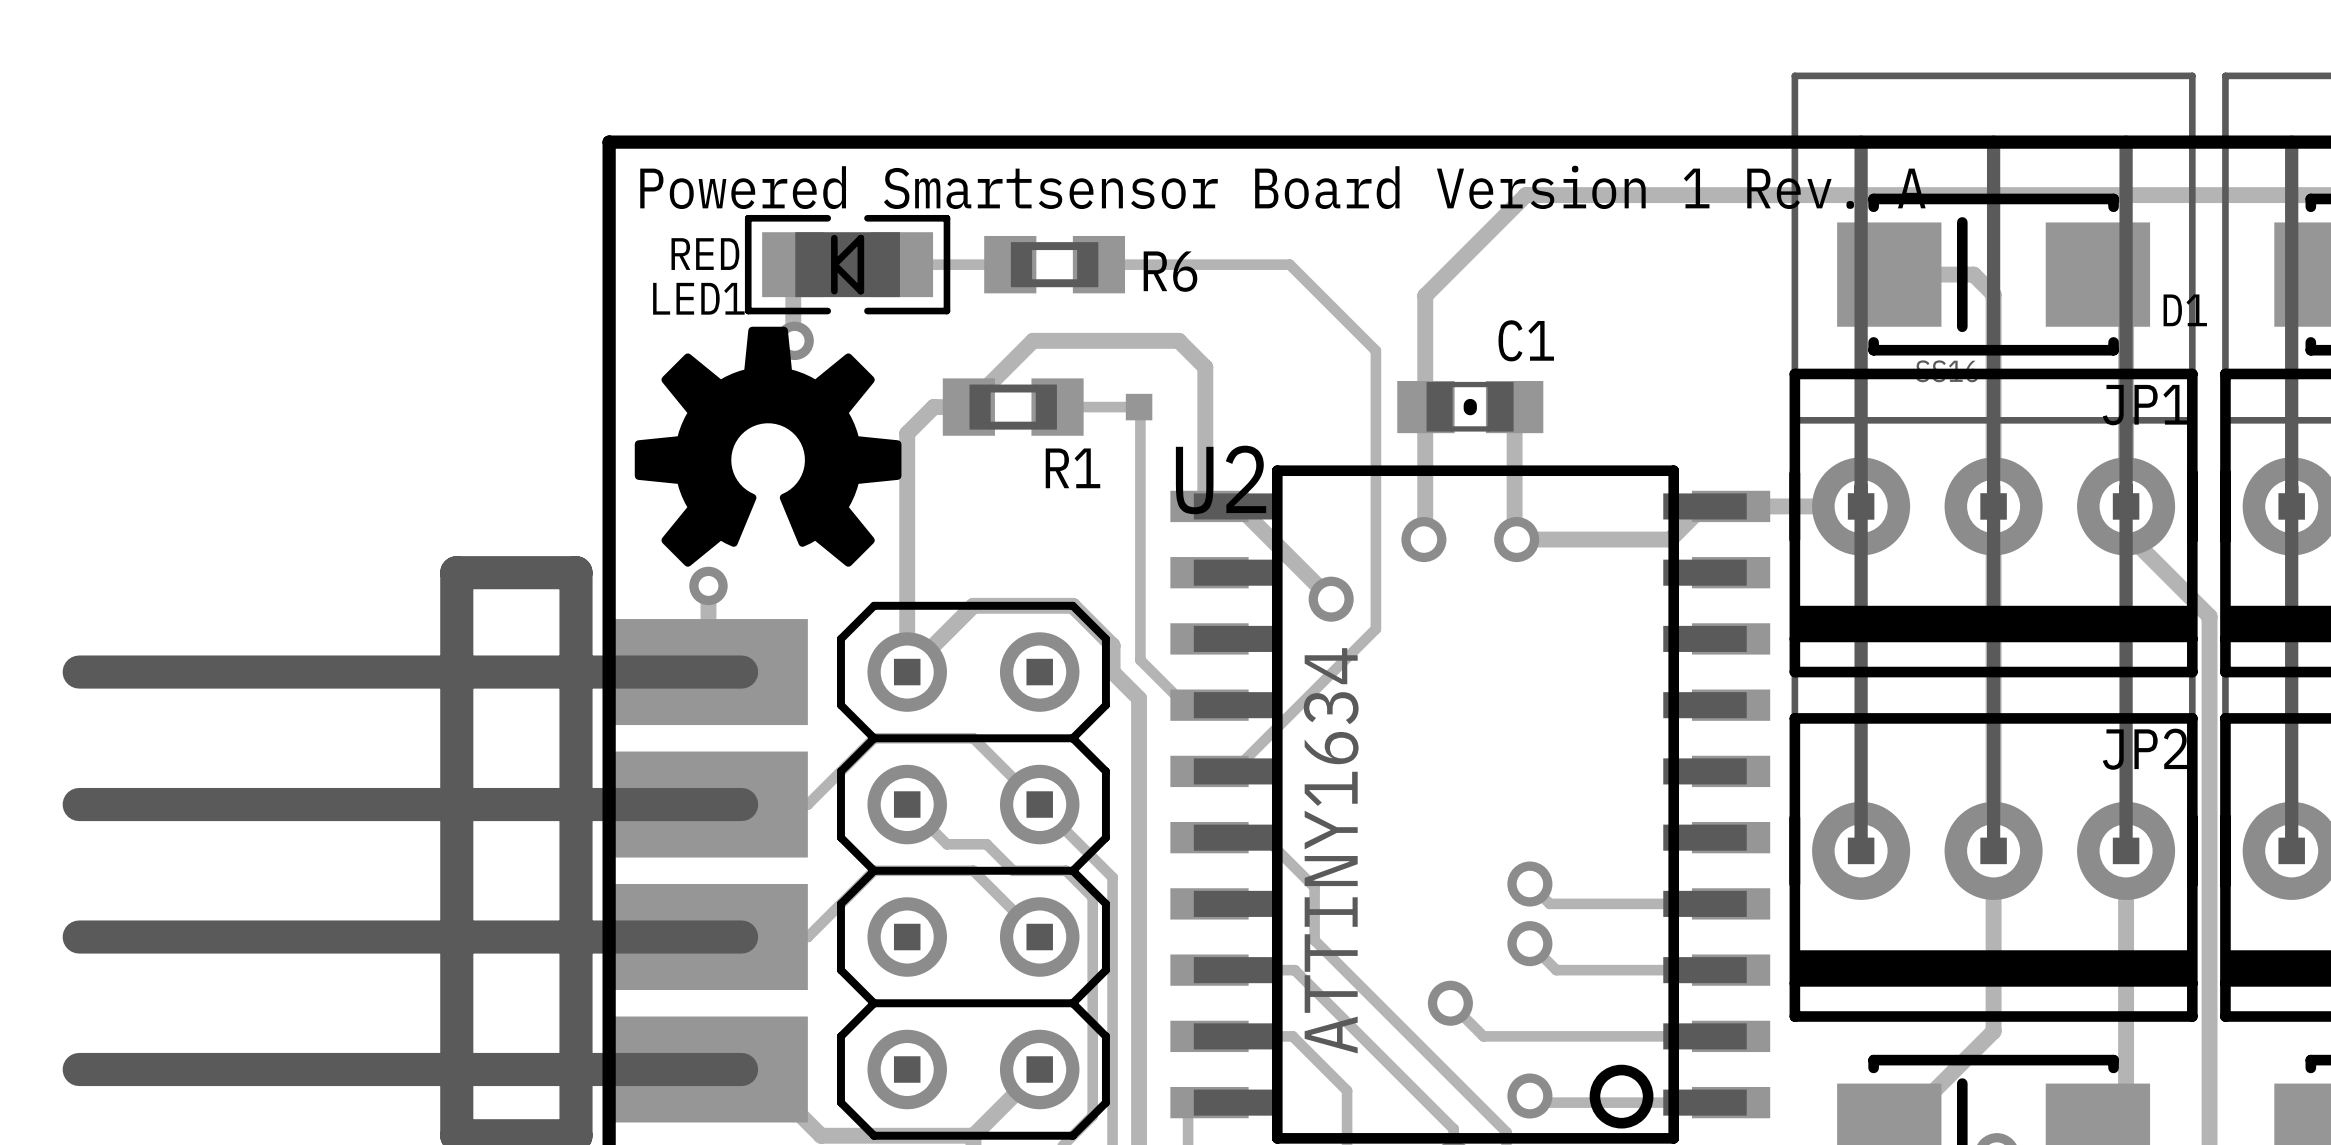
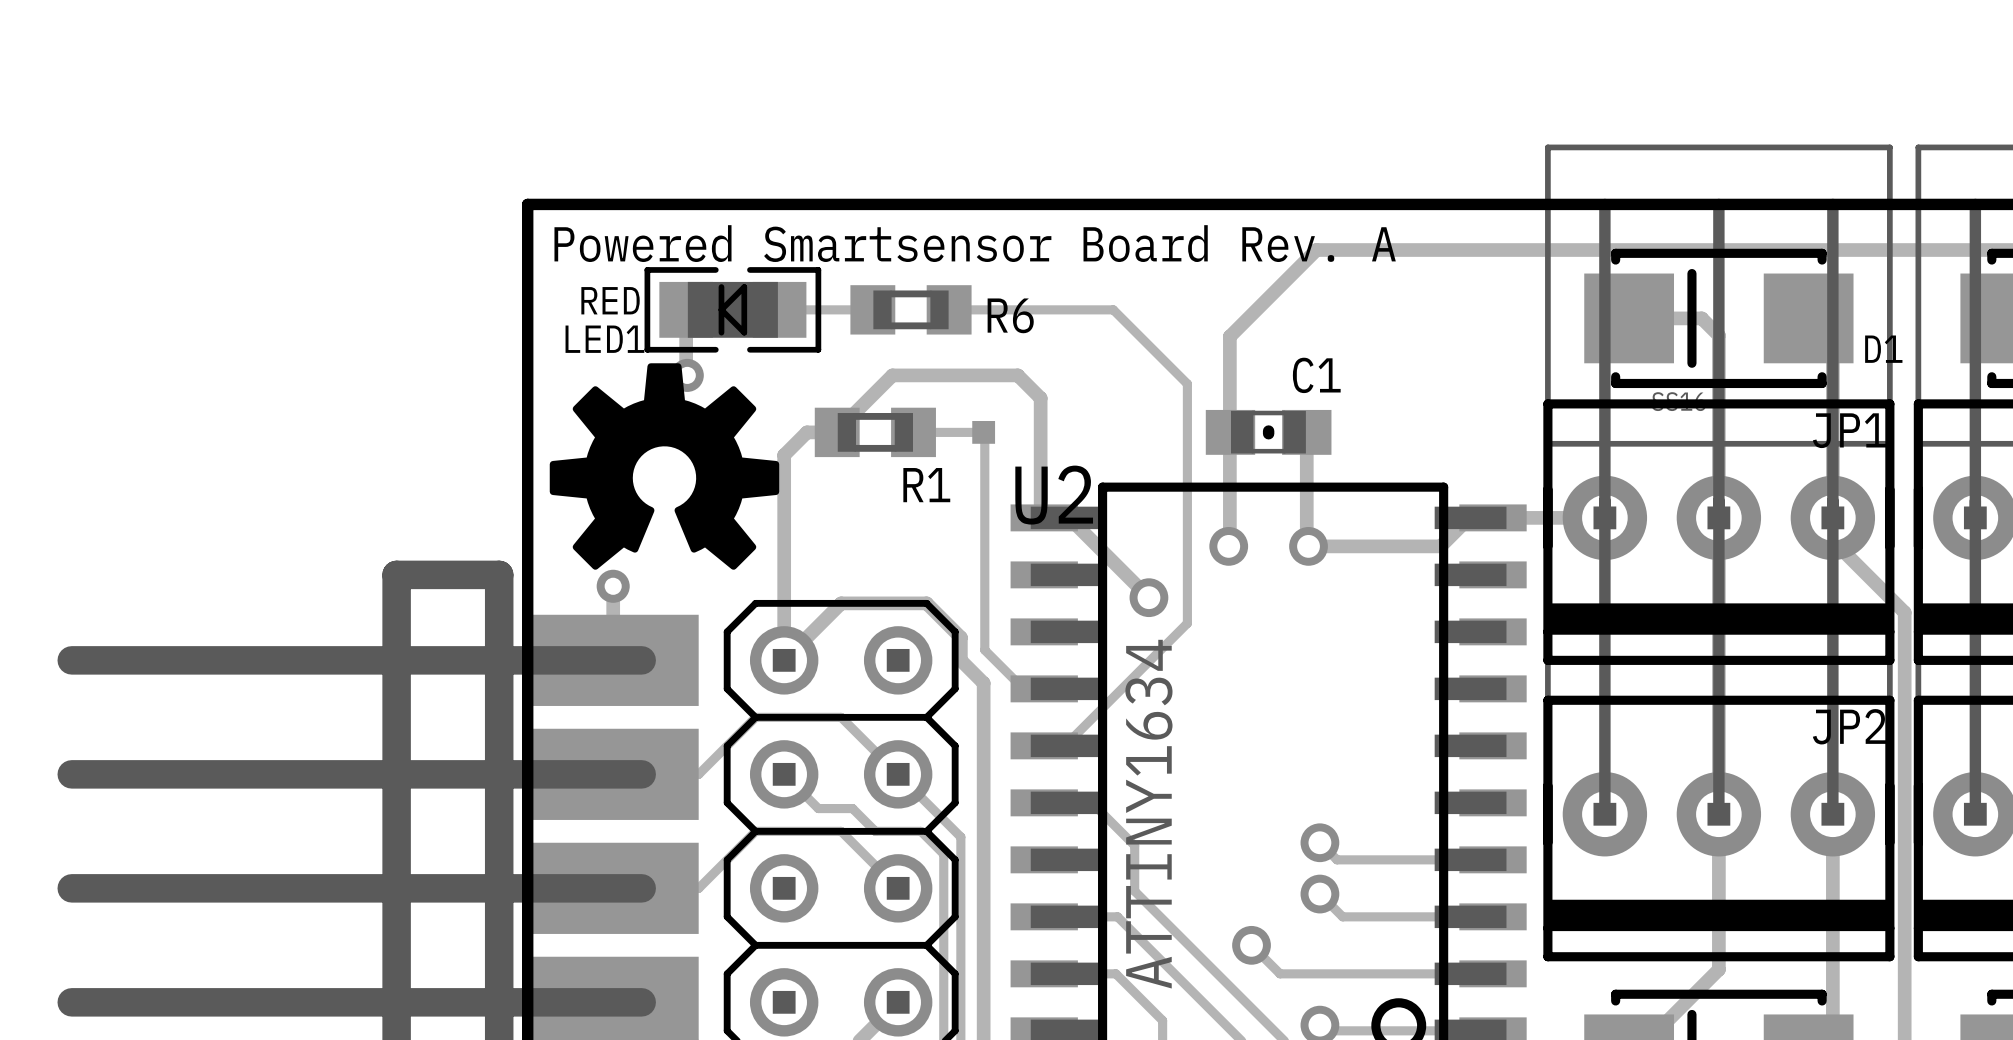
text: Powered Smartsensor Board Version 1 Rev. A (1282, 187) -> Powered Smartsensor Board Rev. A (975, 243)

